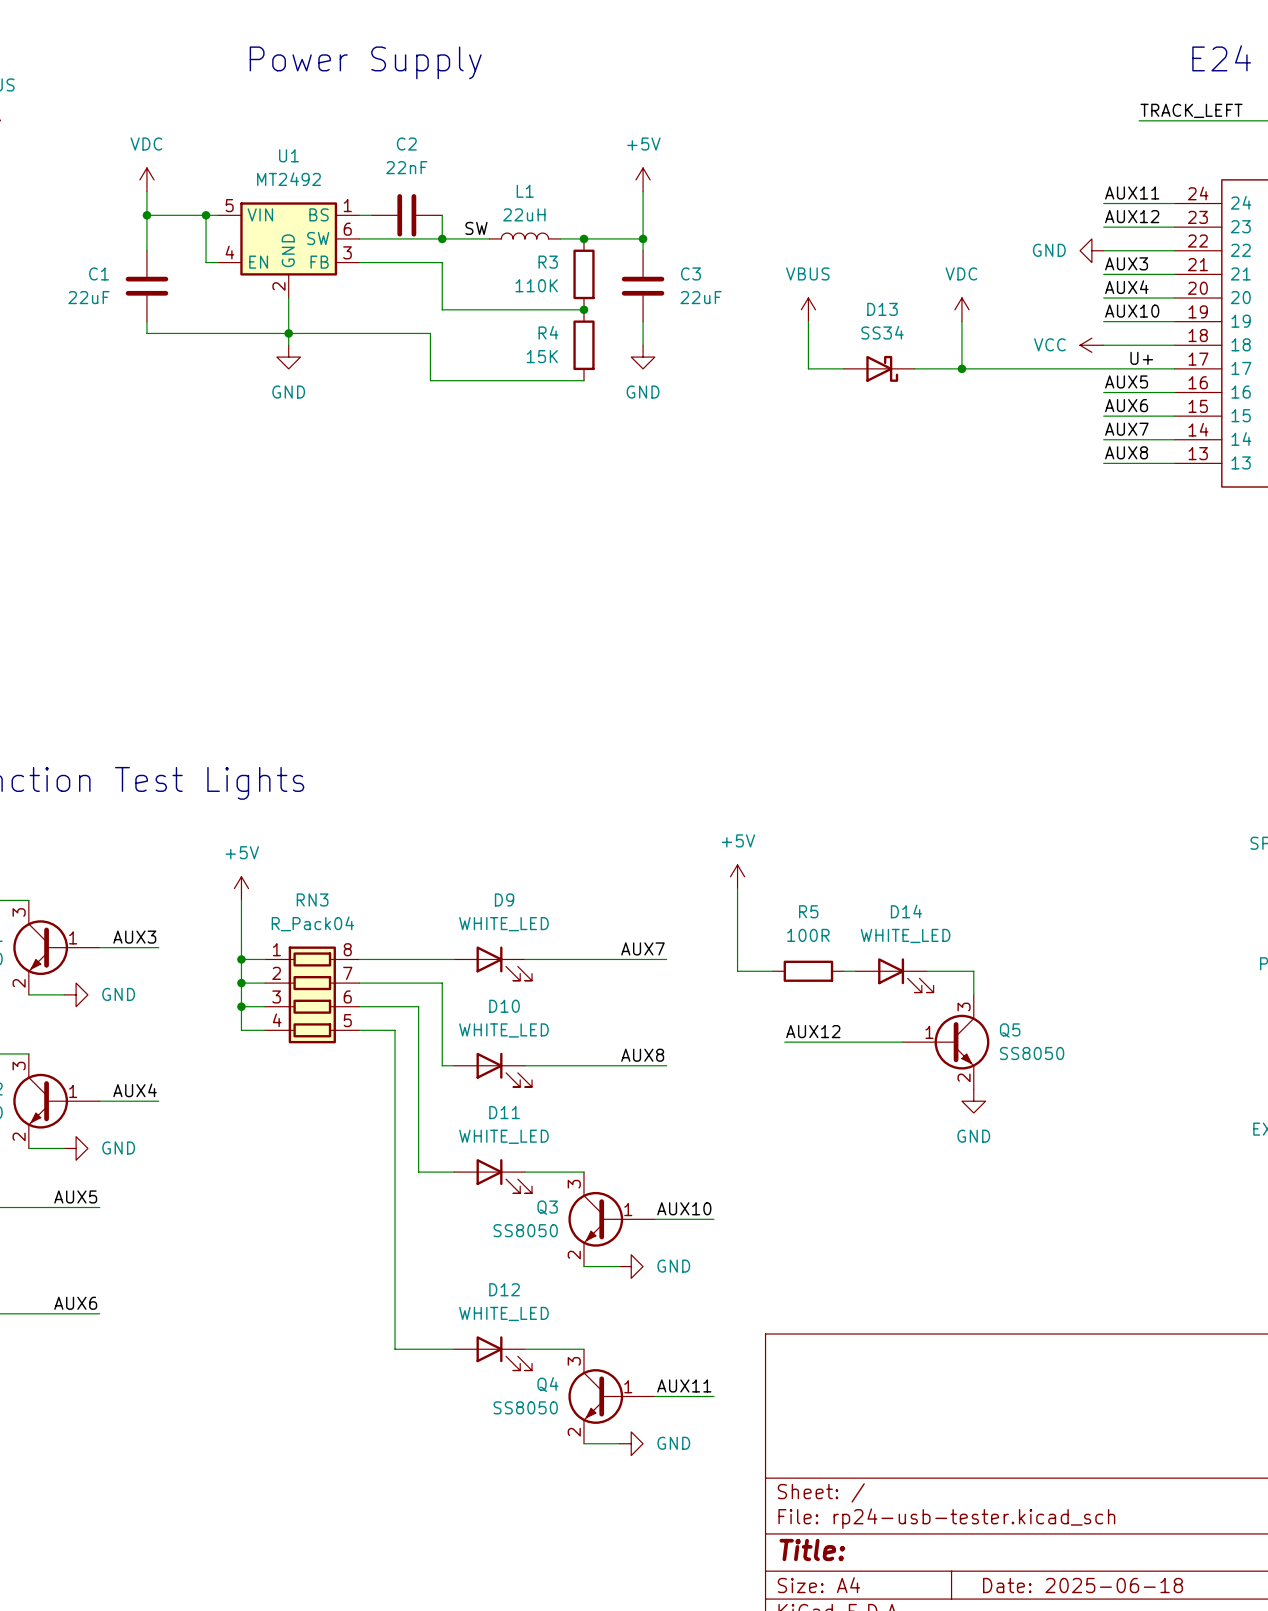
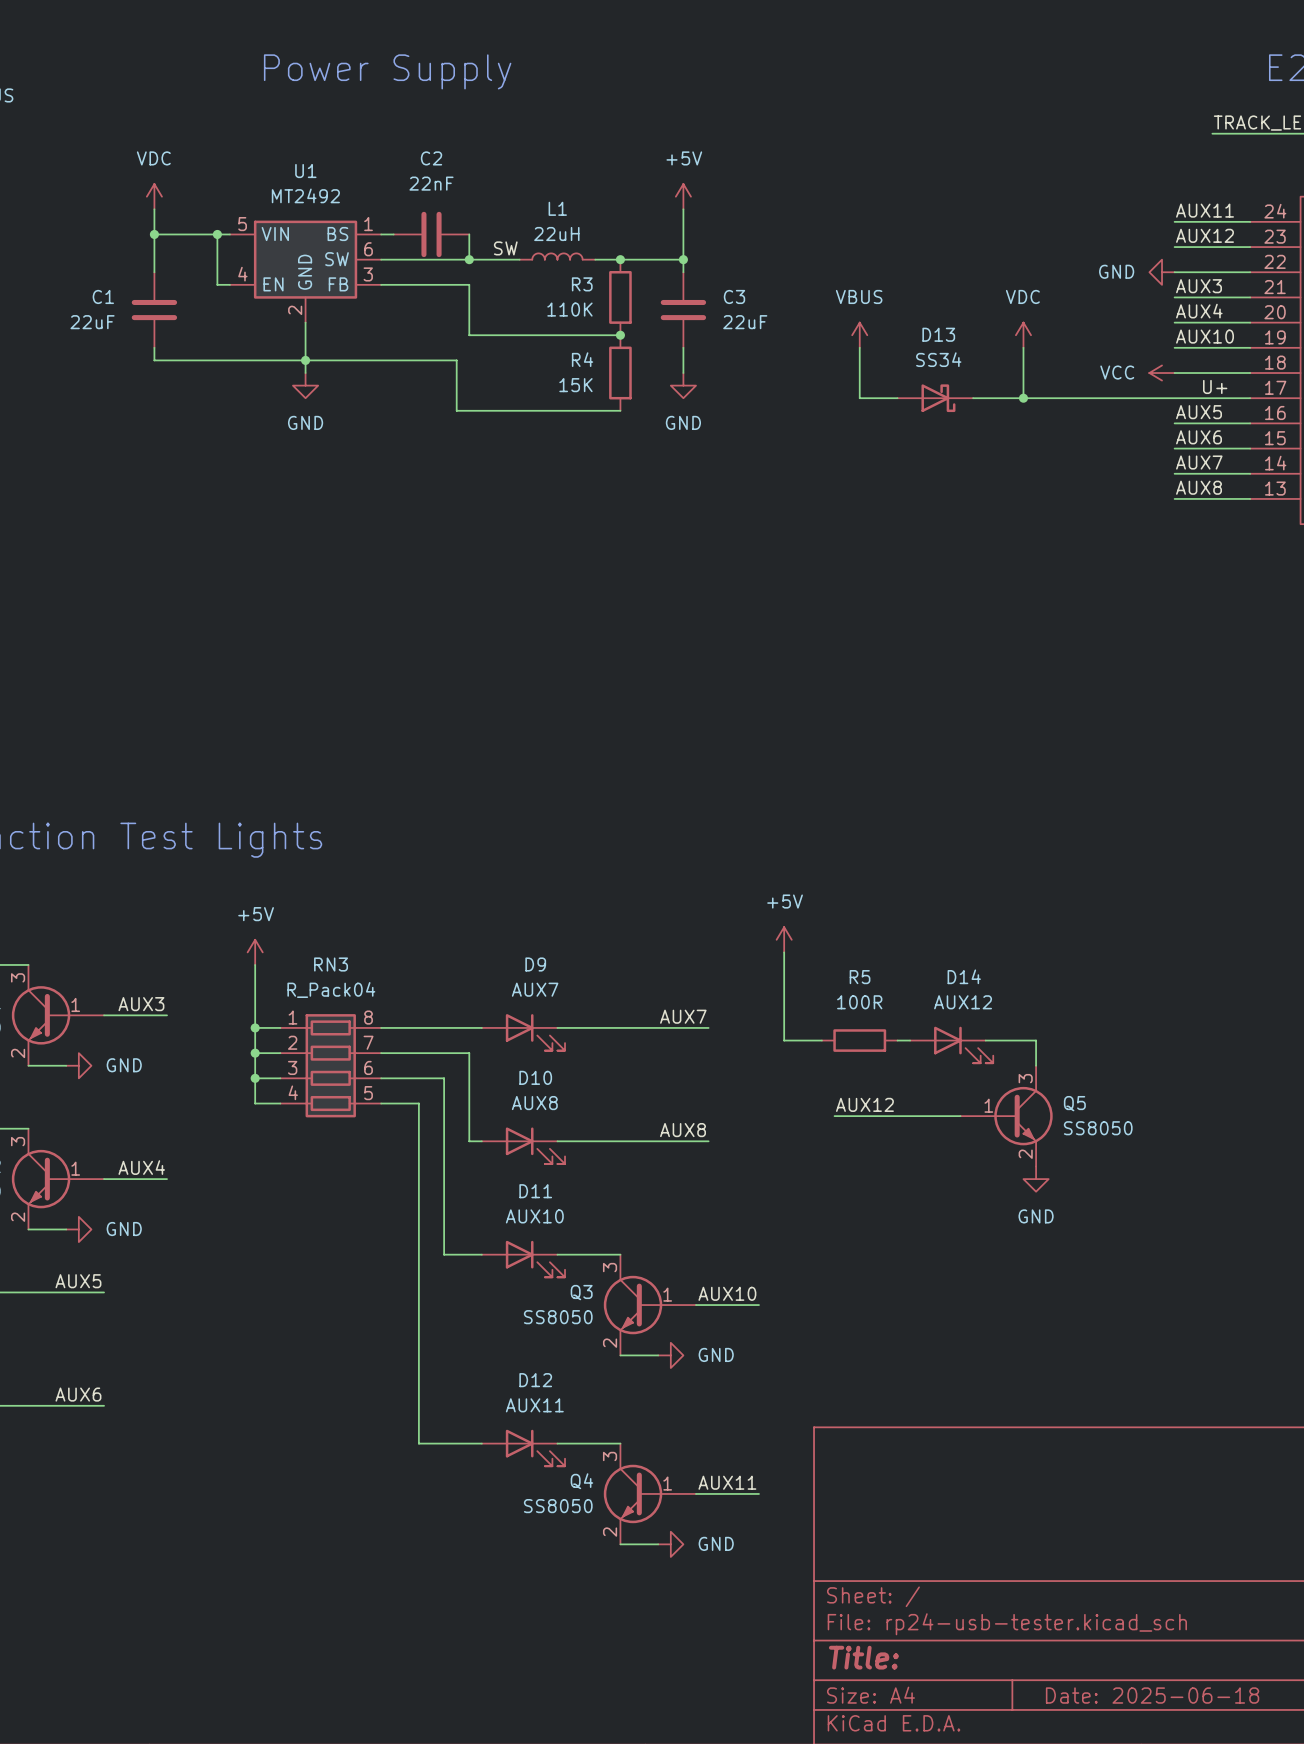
D9 value: WHITE_LED (503, 924) -> AUX7 (535, 989)
D14 value: WHITE_LED (905, 935) -> AUX12 (963, 1002)
D10 value: WHITE_LED (503, 1030) -> AUX8 (534, 1103)
D11 value: WHITE_LED (503, 1136) -> AUX10 (534, 1216)
D12 value: WHITE_LED (503, 1313) -> AUX11 (534, 1405)

